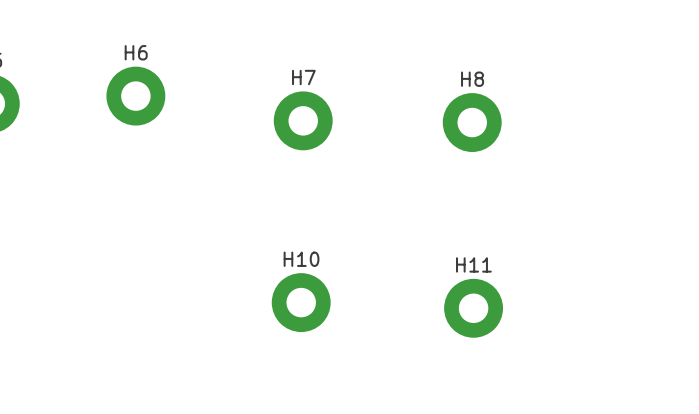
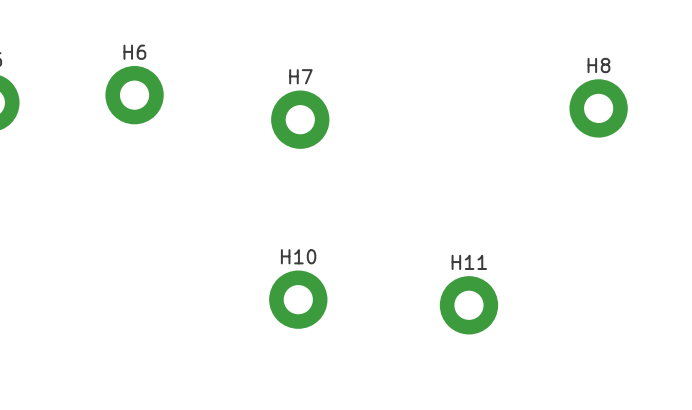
H8 position: (472, 122) -> (598, 108)

